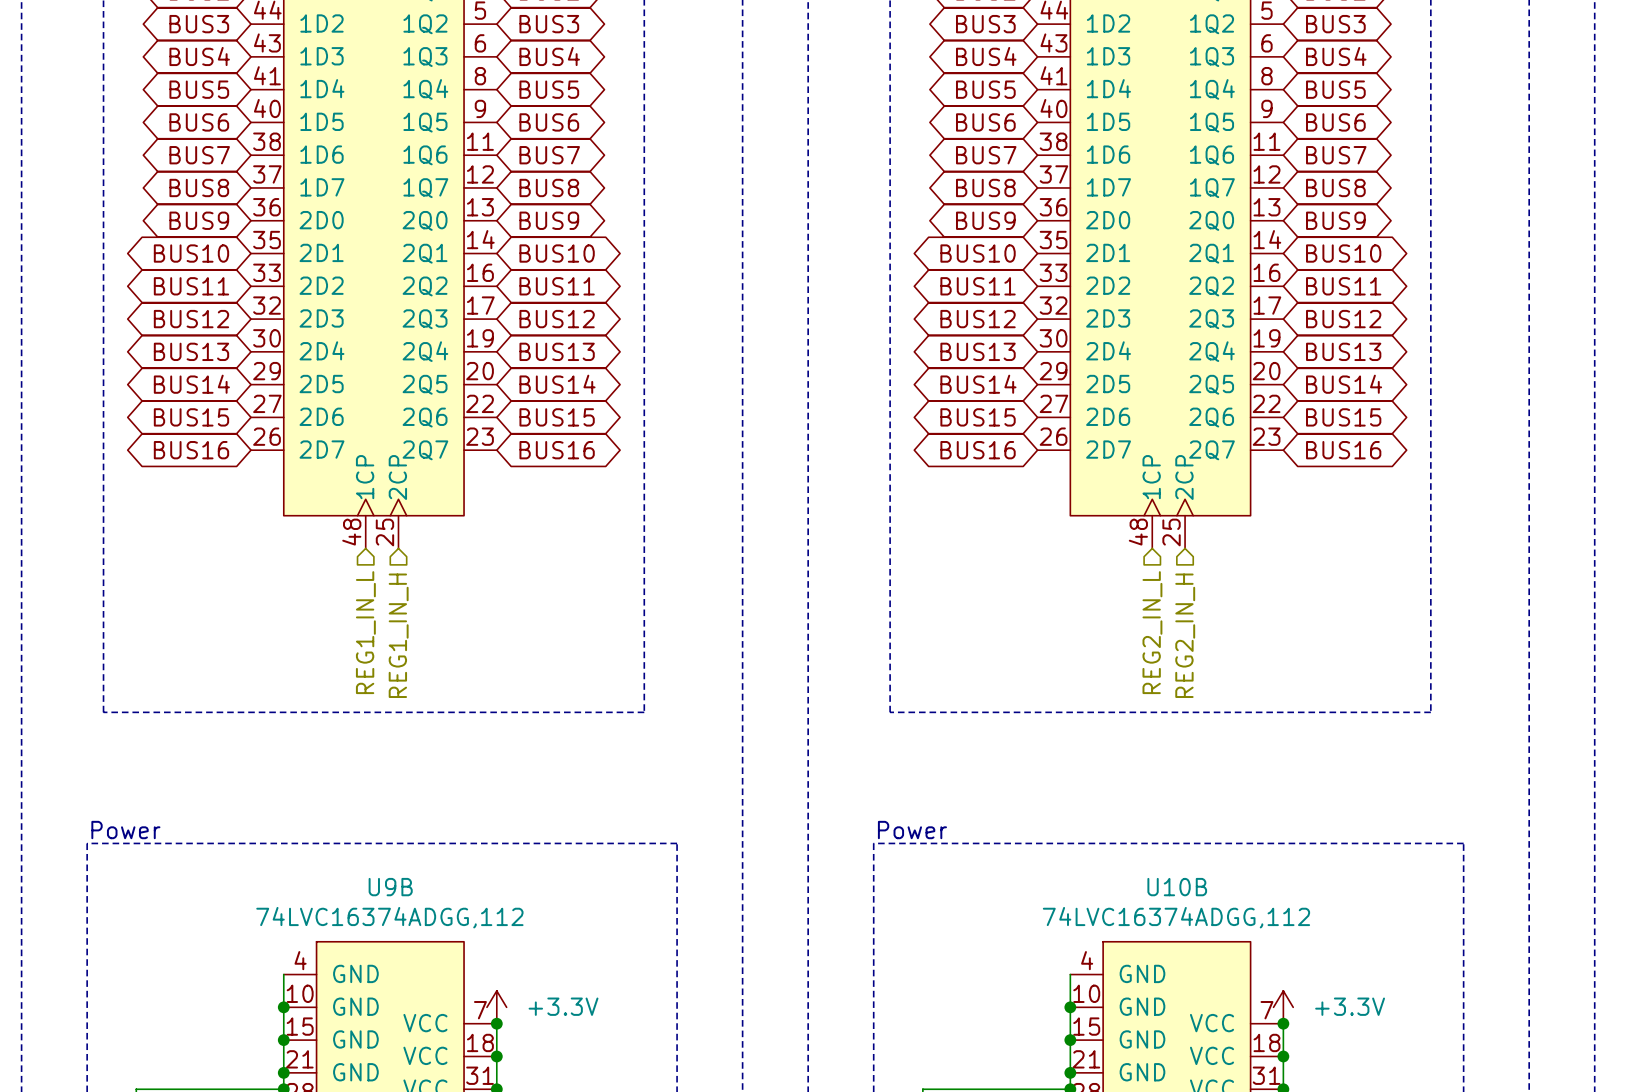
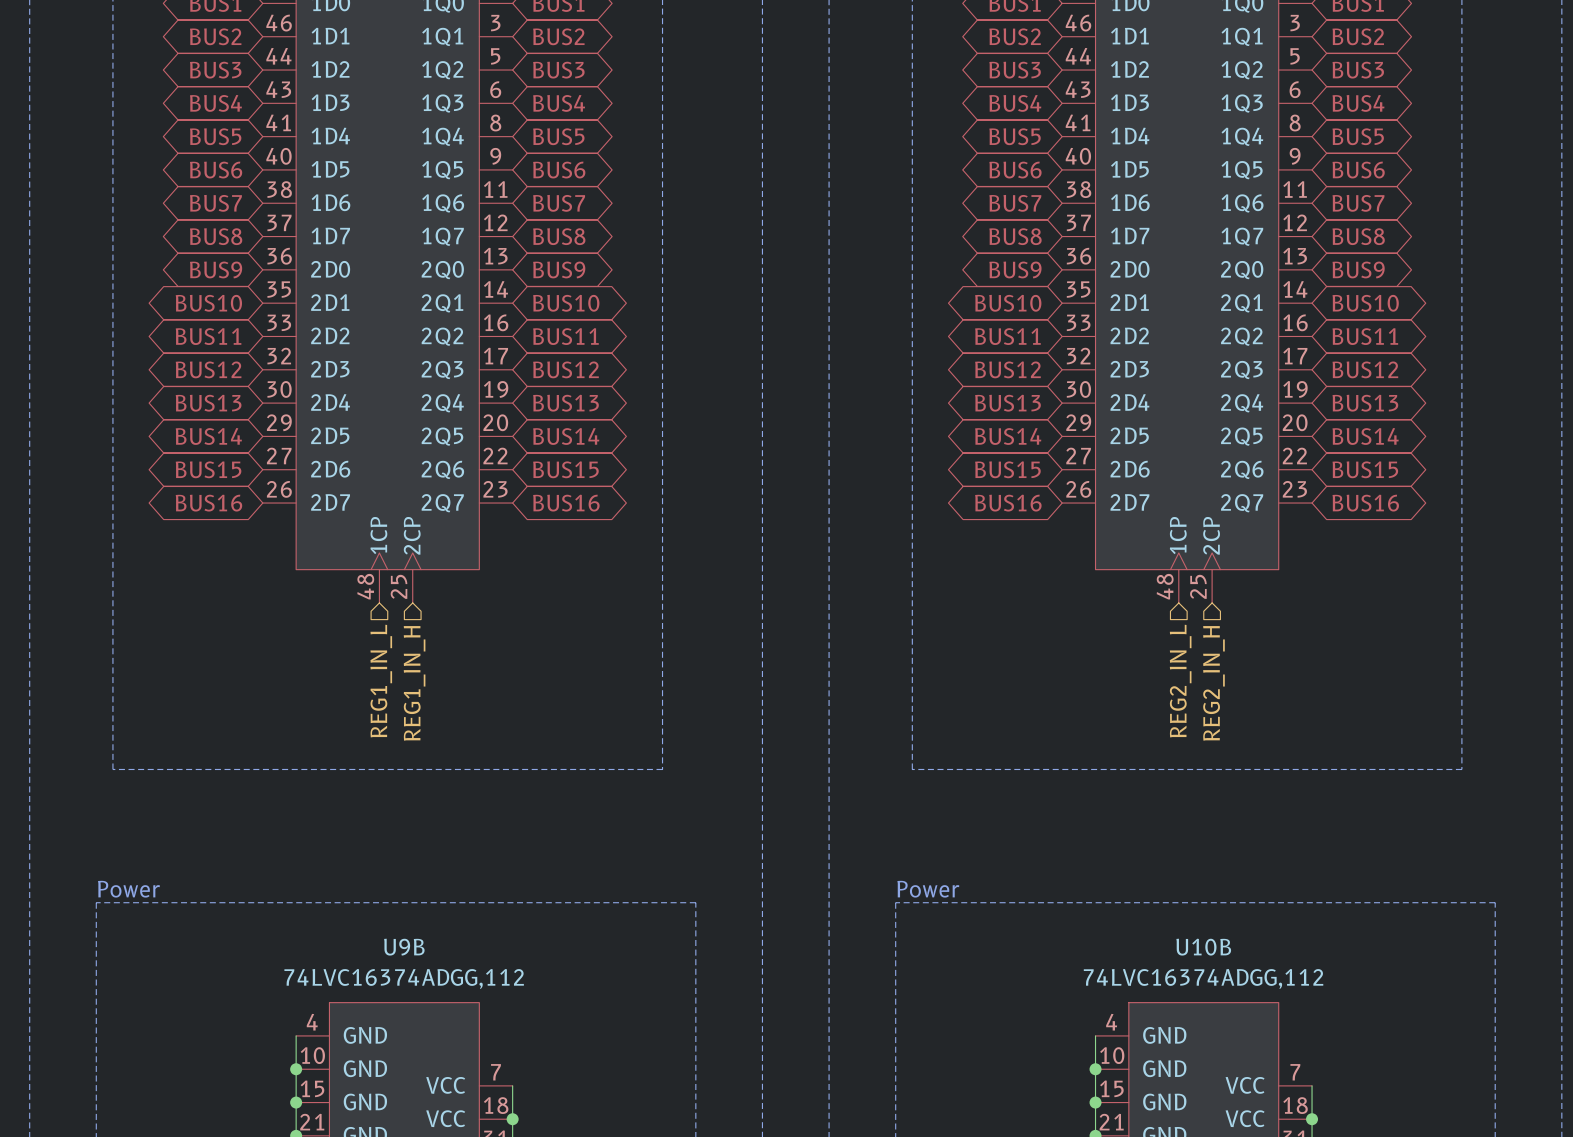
power symbol: +3.3V (496, 1007) -> none
power symbol: +3.3V (1283, 1007) -> none
junction: (496, 1023) -> none
junction: (1283, 1023) -> none

